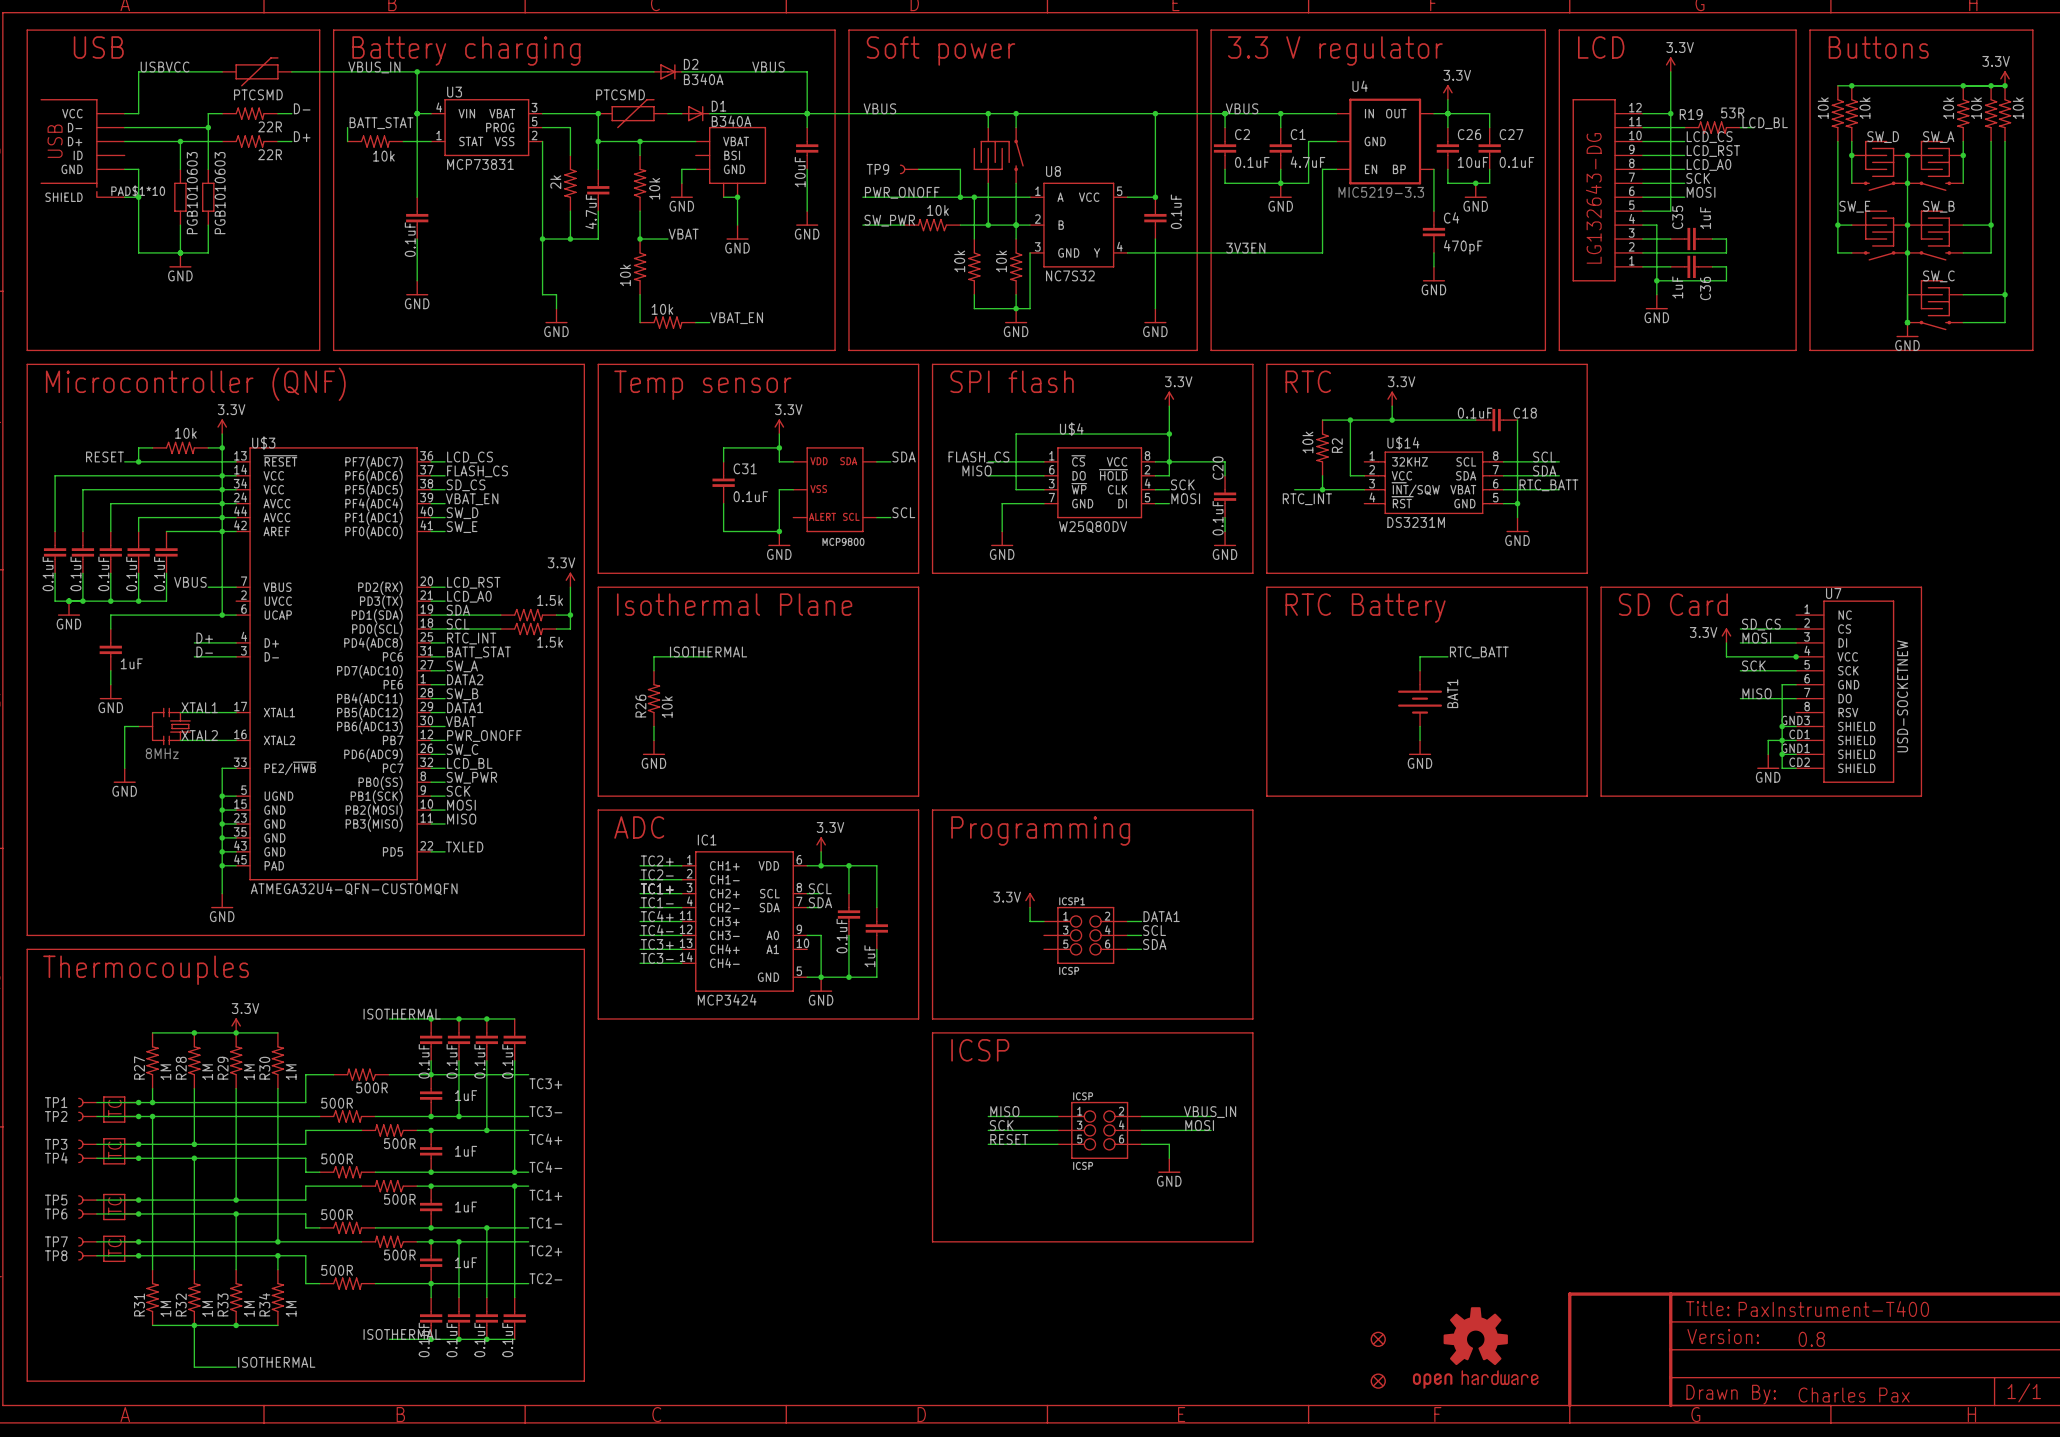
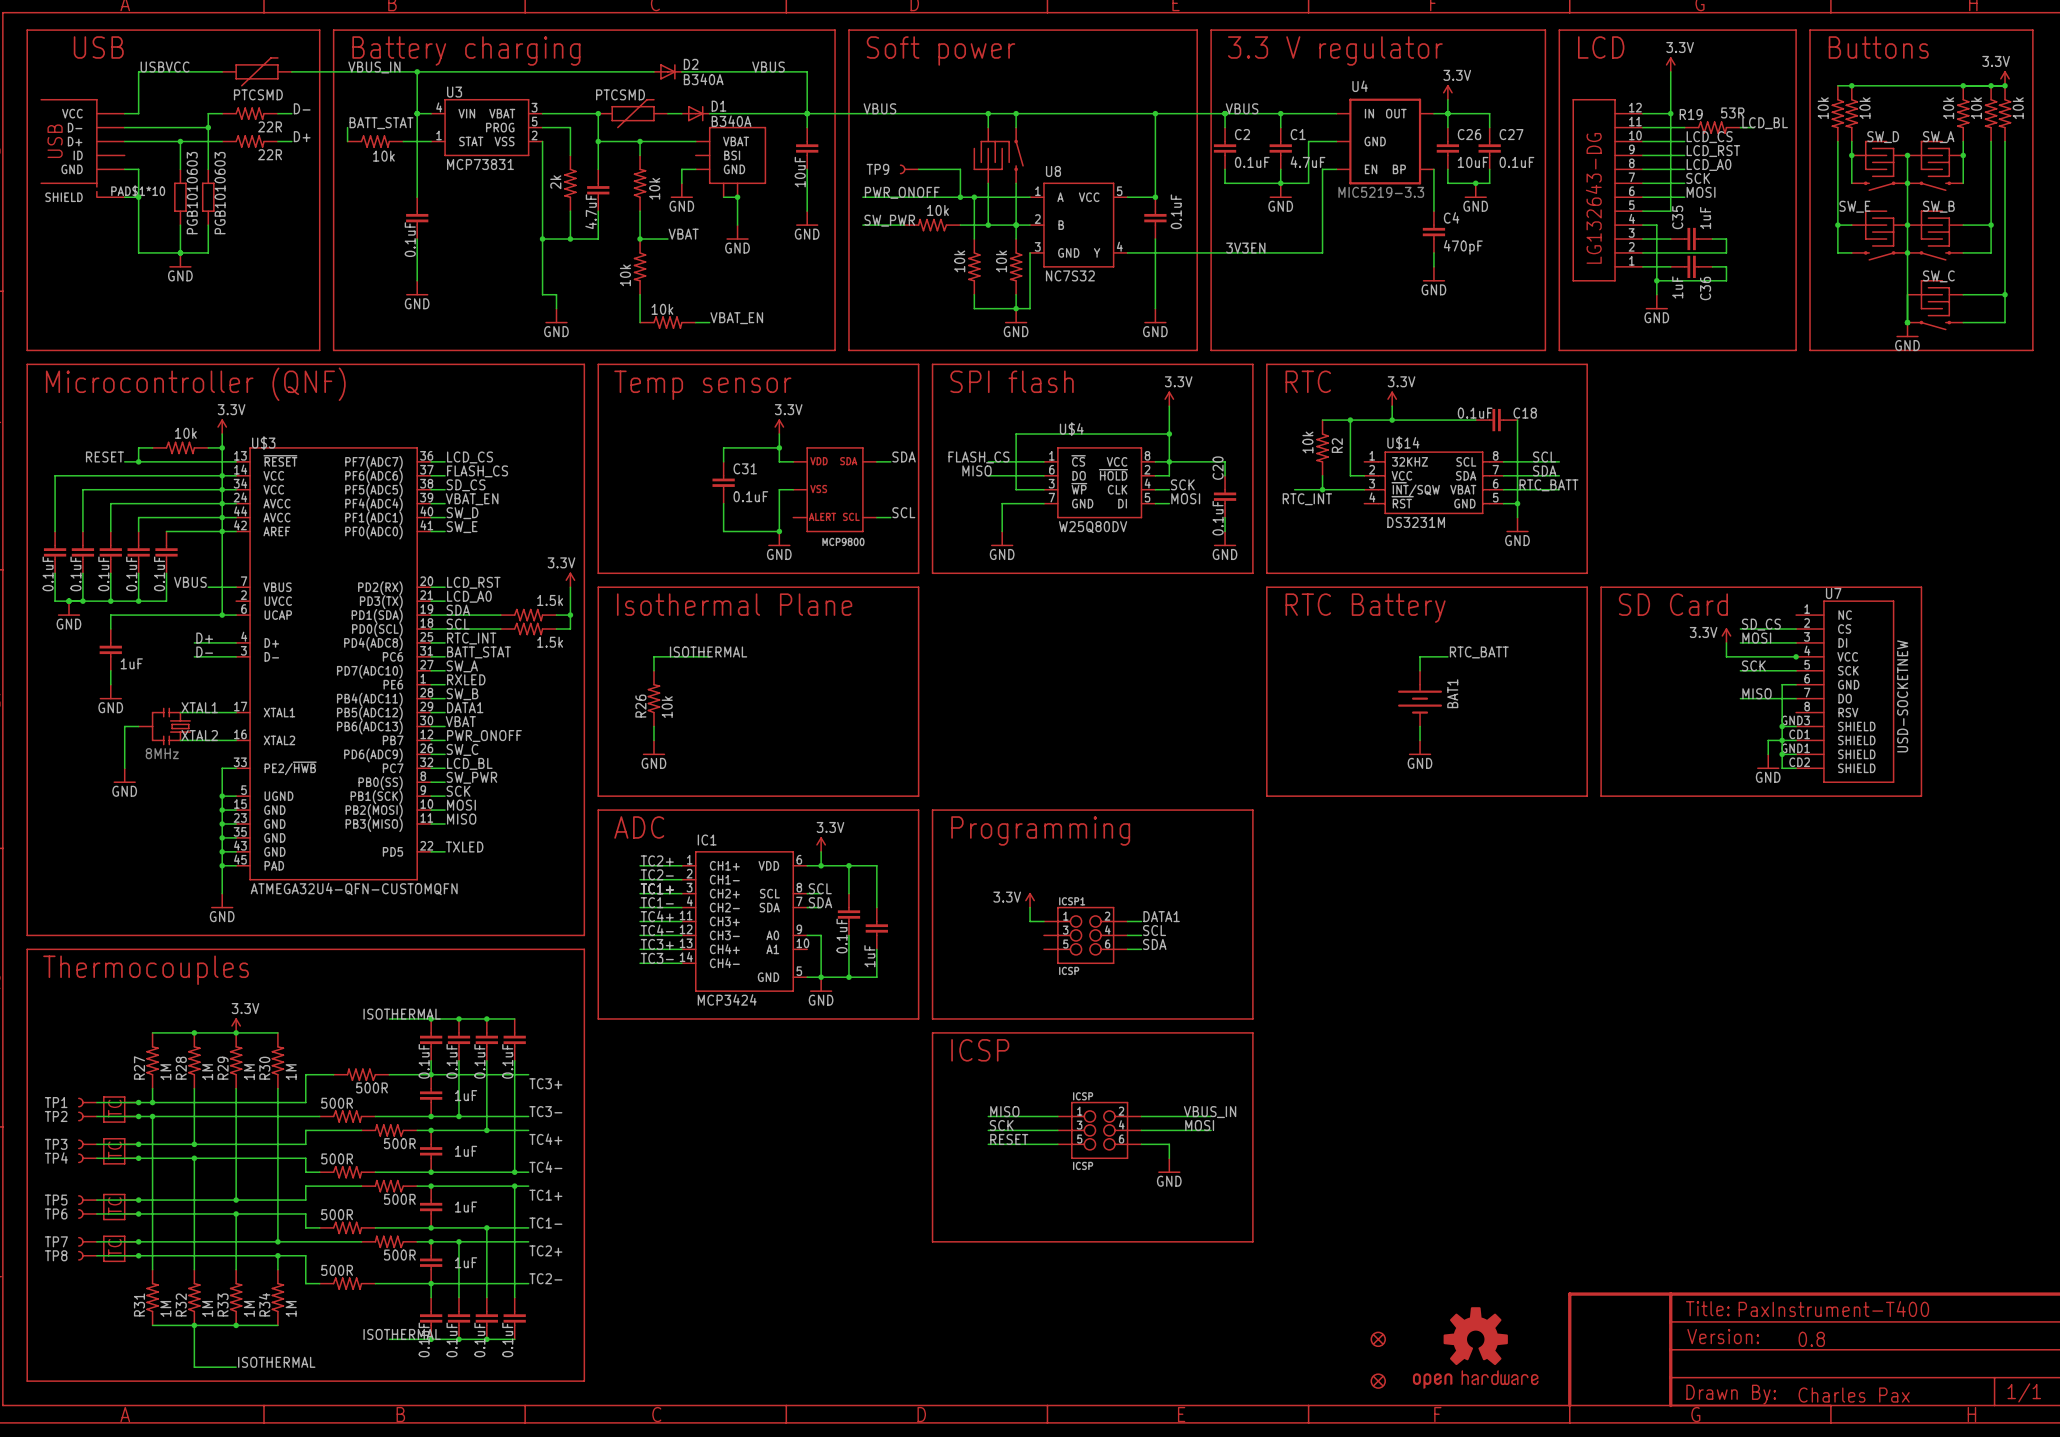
label: DATA2 (465, 679) -> RXLED (466, 679)

